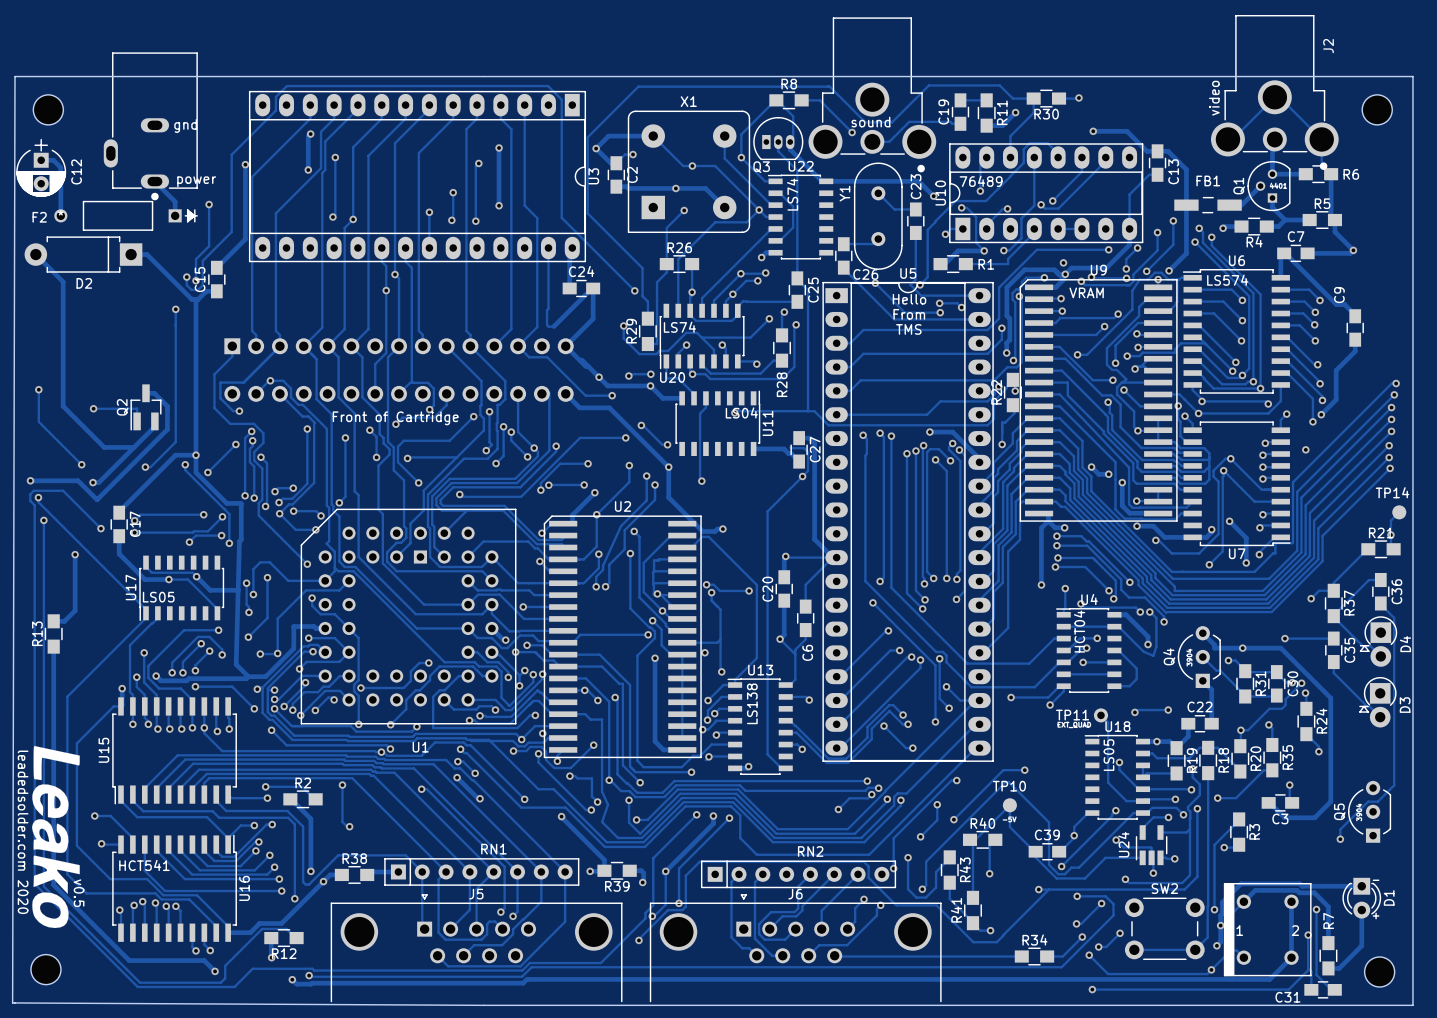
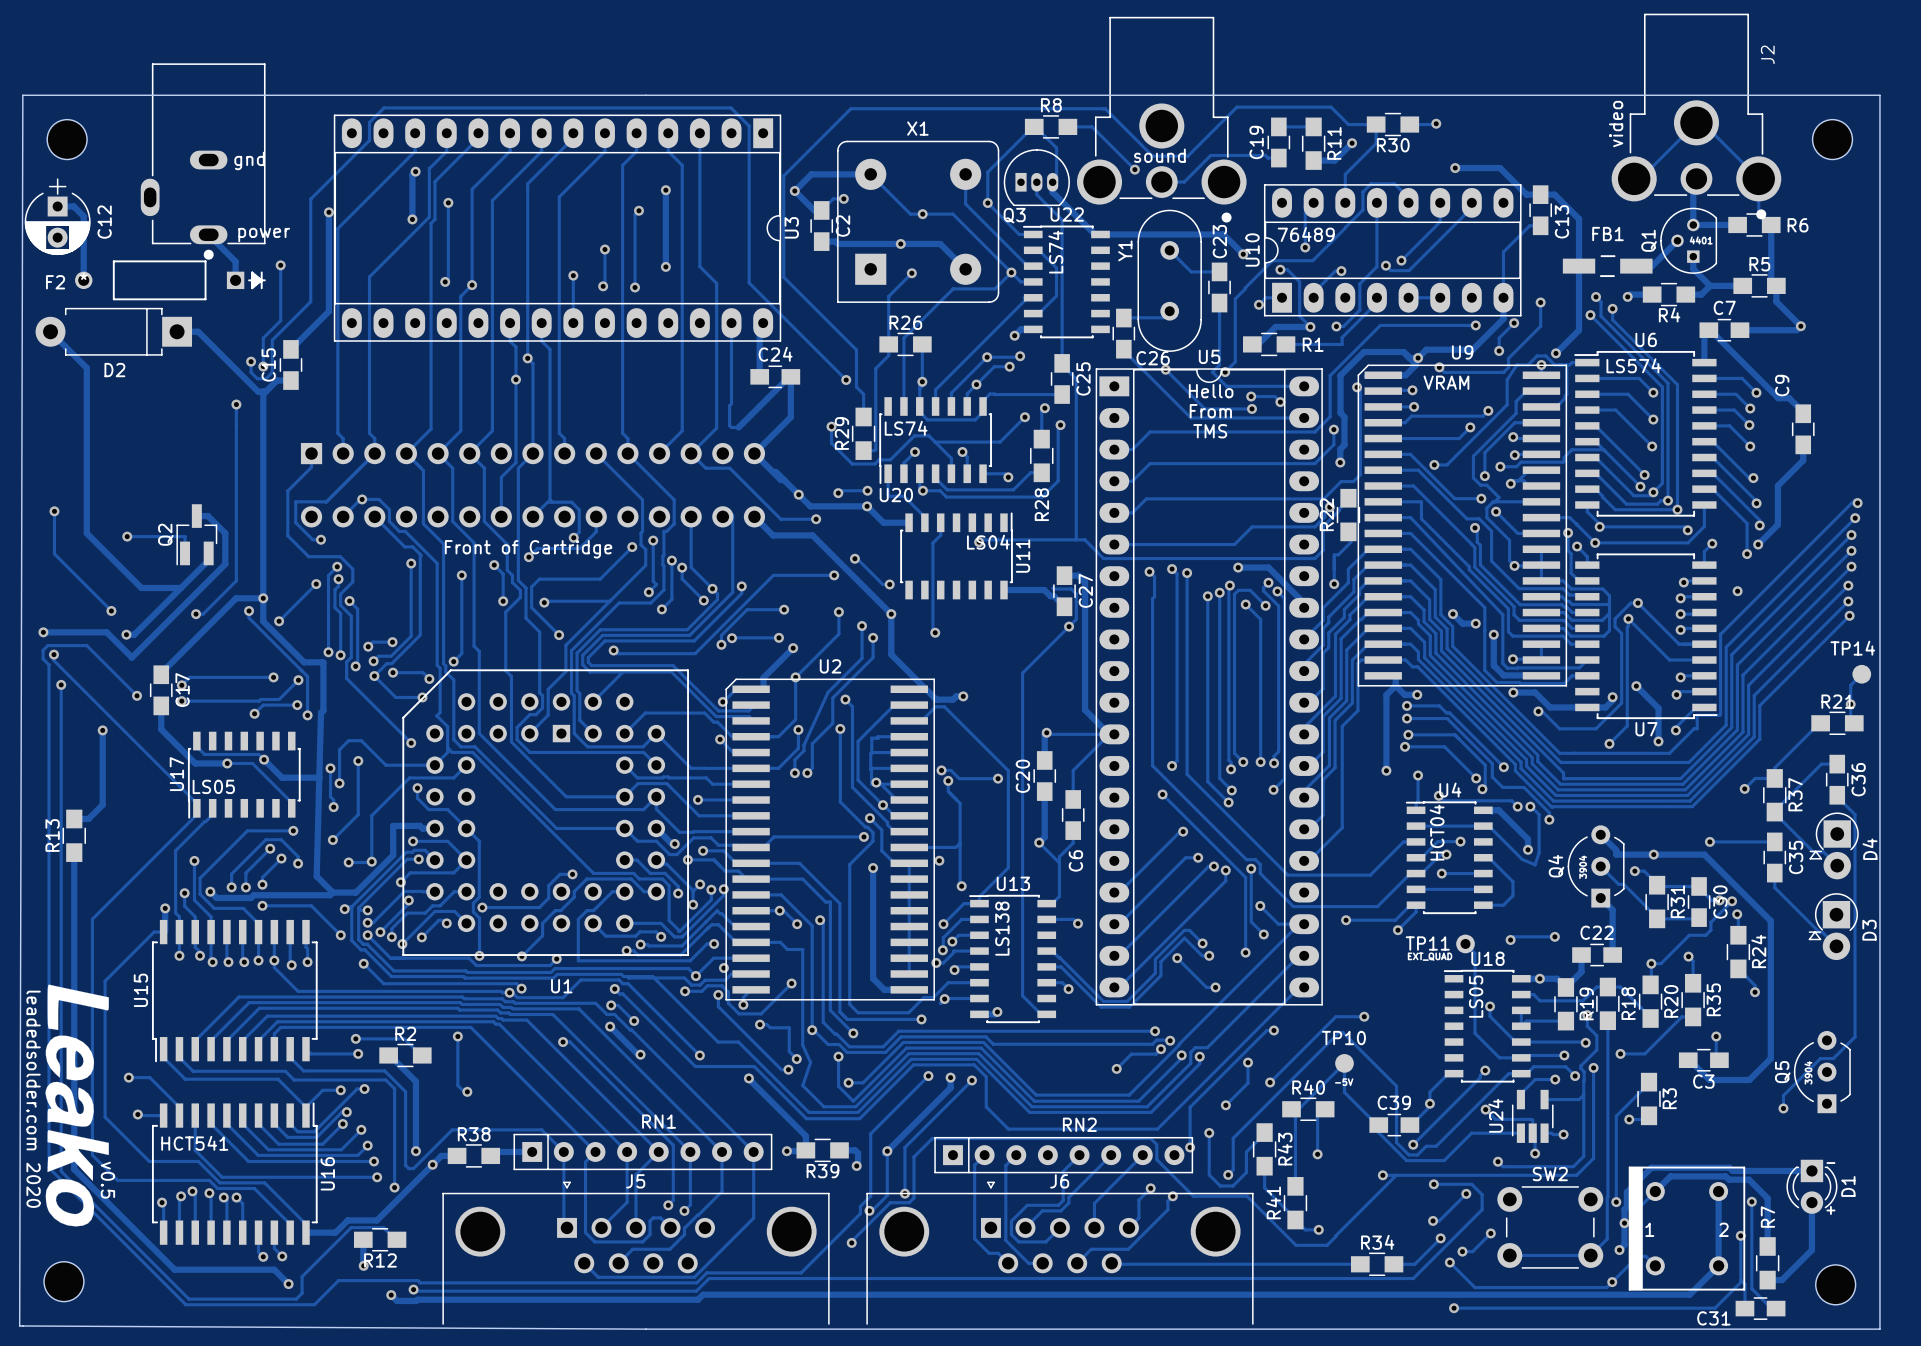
via: (1173, 220) -> none
track: (1173, 221) (1173, 244) (1146, 271) -> none
via: (1063, 262) -> none
via: (1146, 271) -> none
track: (1044, 277) (1026, 277) (1021, 282) (1021, 286) (1012, 293) (1012, 299) (1015, 302) (1015, 358) (1013, 360) -> none
via: (1044, 277) -> none
track: (1091, 277) (1126, 278) -> none
via: (1091, 277) -> none
via: (1126, 278) -> none
via: (1013, 360) -> none
via: (1015, 391) -> none

